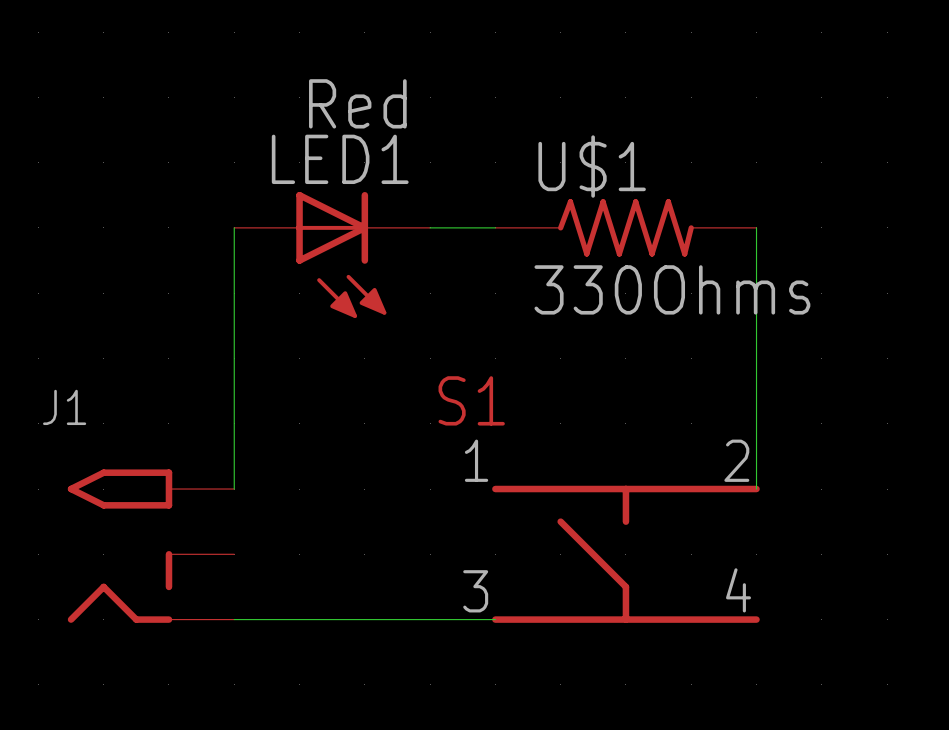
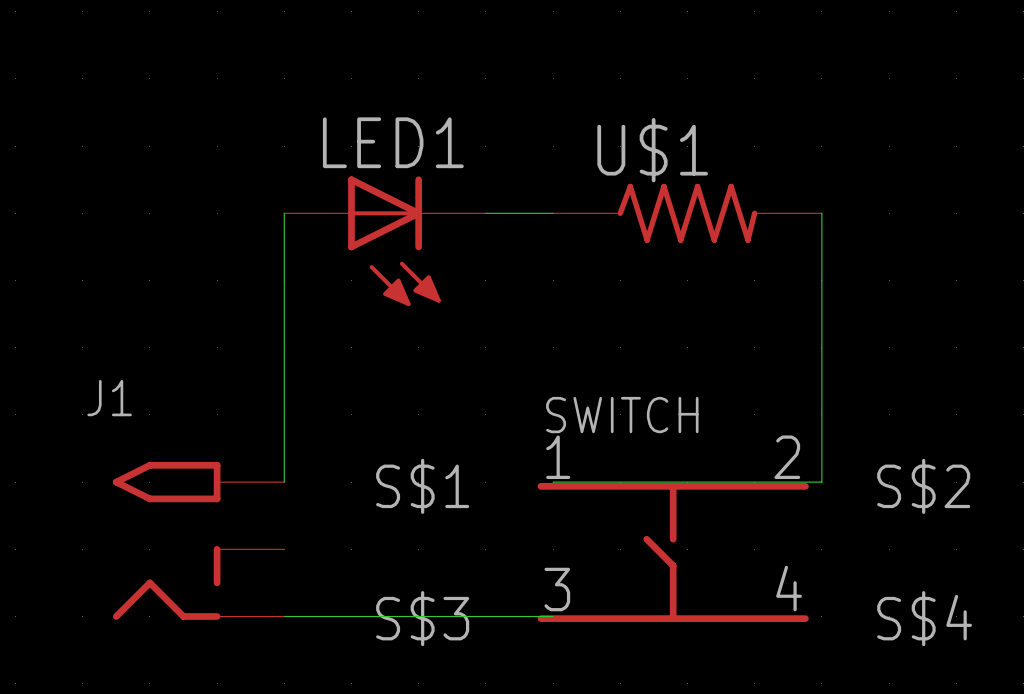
LED1 value: Red (357, 103) -> none
U$1 value: 330Ohms (672, 289) -> none
S1: (625, 554) -> none
part: none -> (673, 552)

